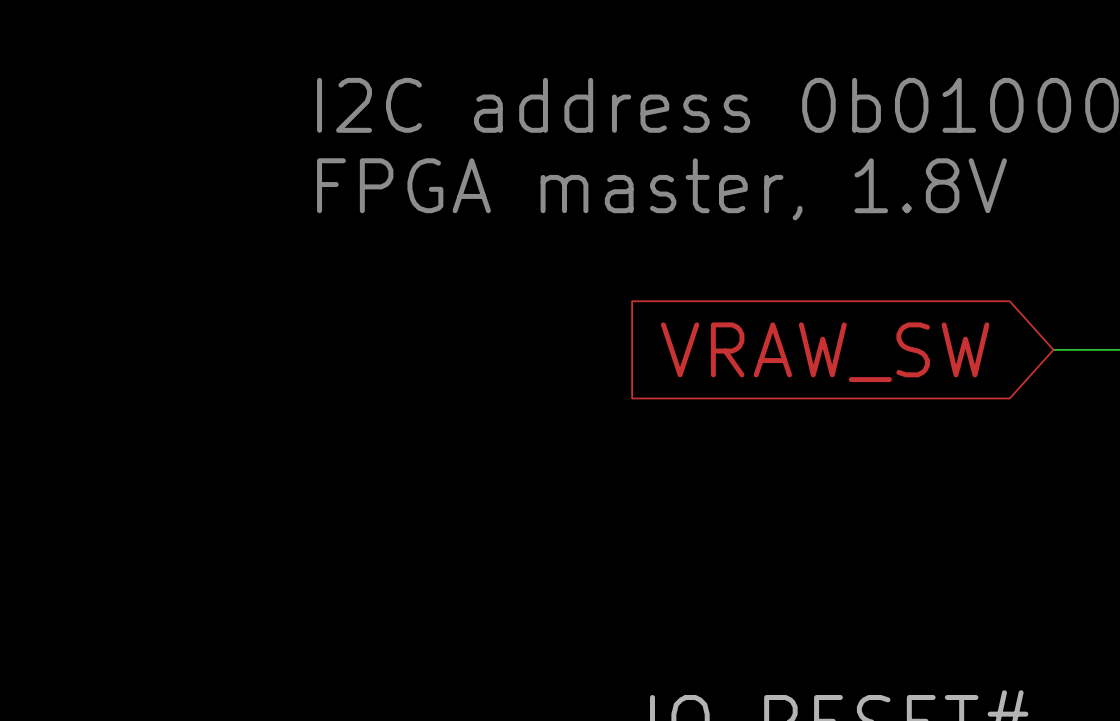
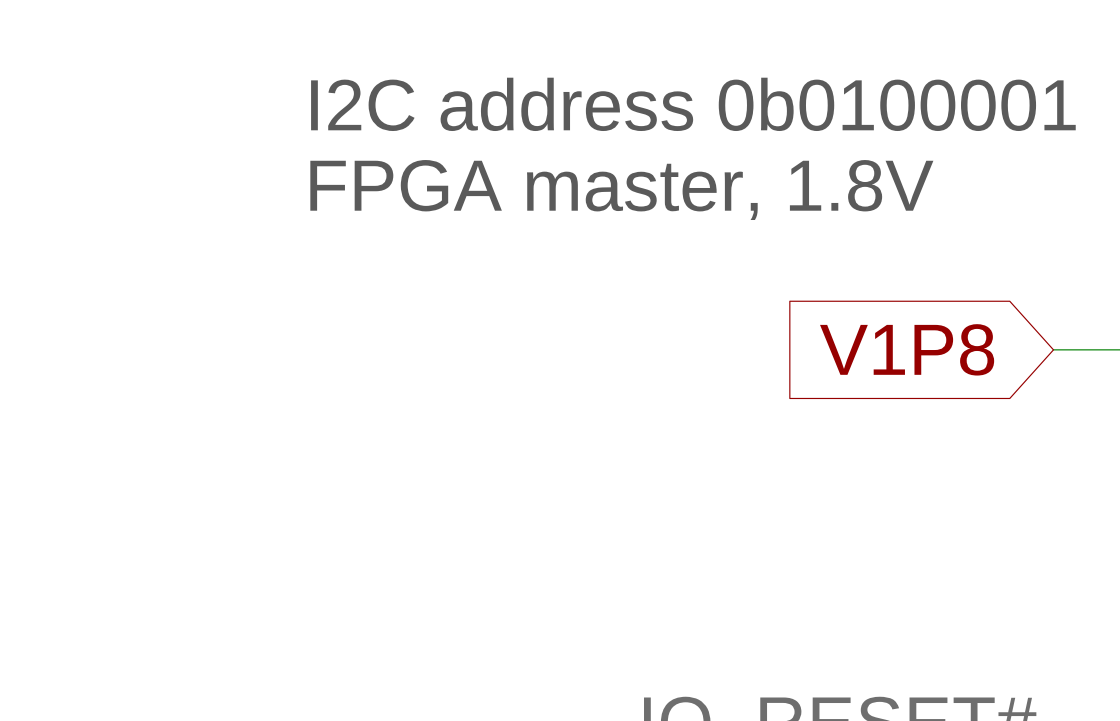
global label: VRAW_SW (825, 352) -> V1P8 (907, 349)

